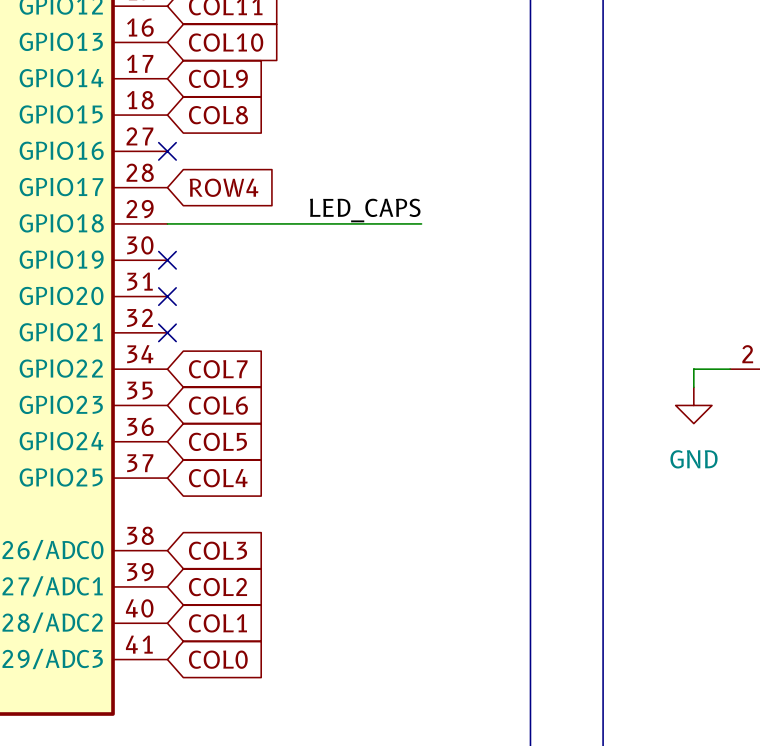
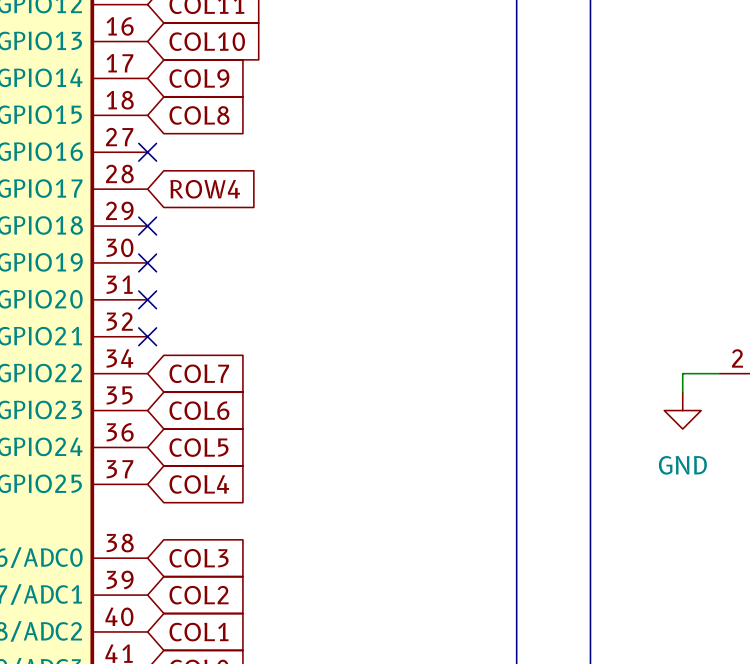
label: LED_CAPS (365, 210) -> none
wire: (167, 223) (421, 223) -> none
no-connect mark: none -> (147, 226)

